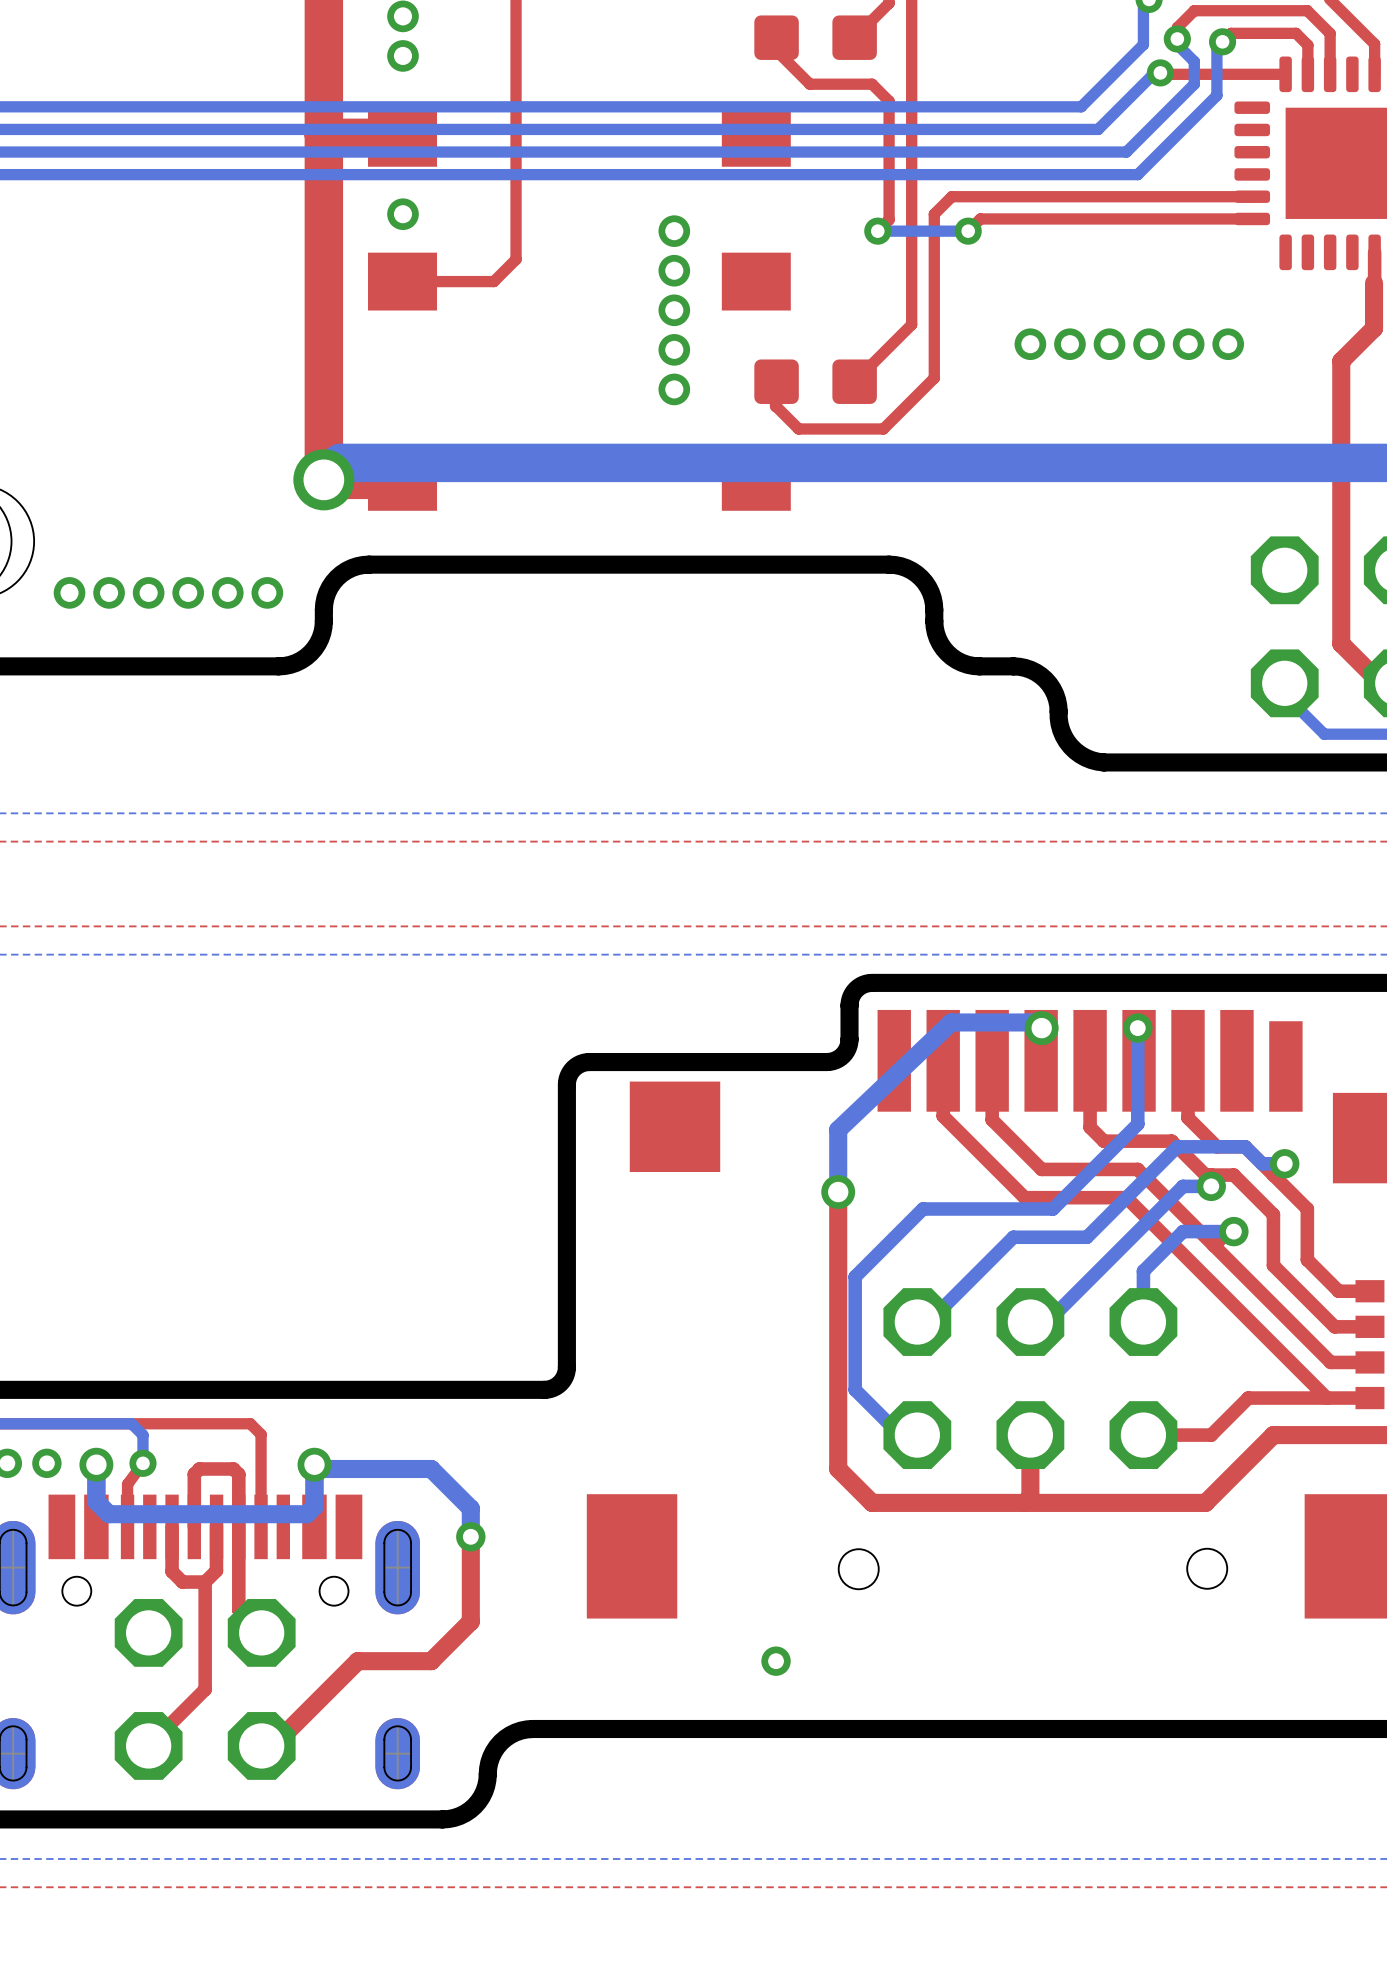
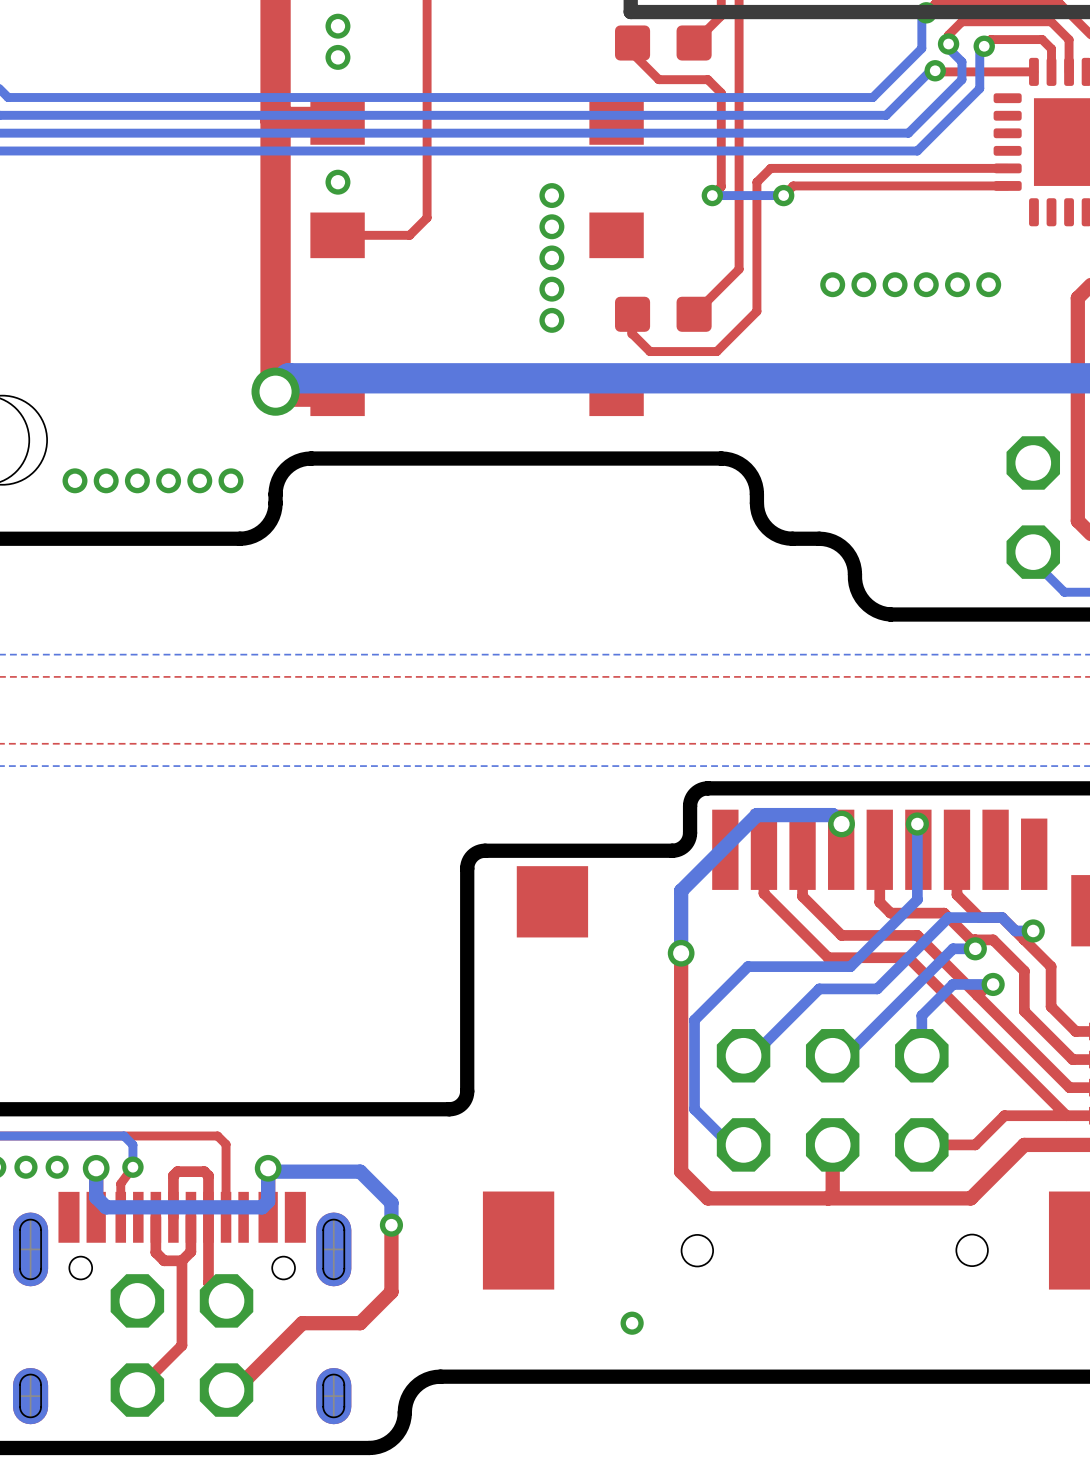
bottom track: (1036, 1022) (951, 1022) (838, 1129) -> (837, 819) (832, 815) (756, 815) (681, 890) (681, 904)

